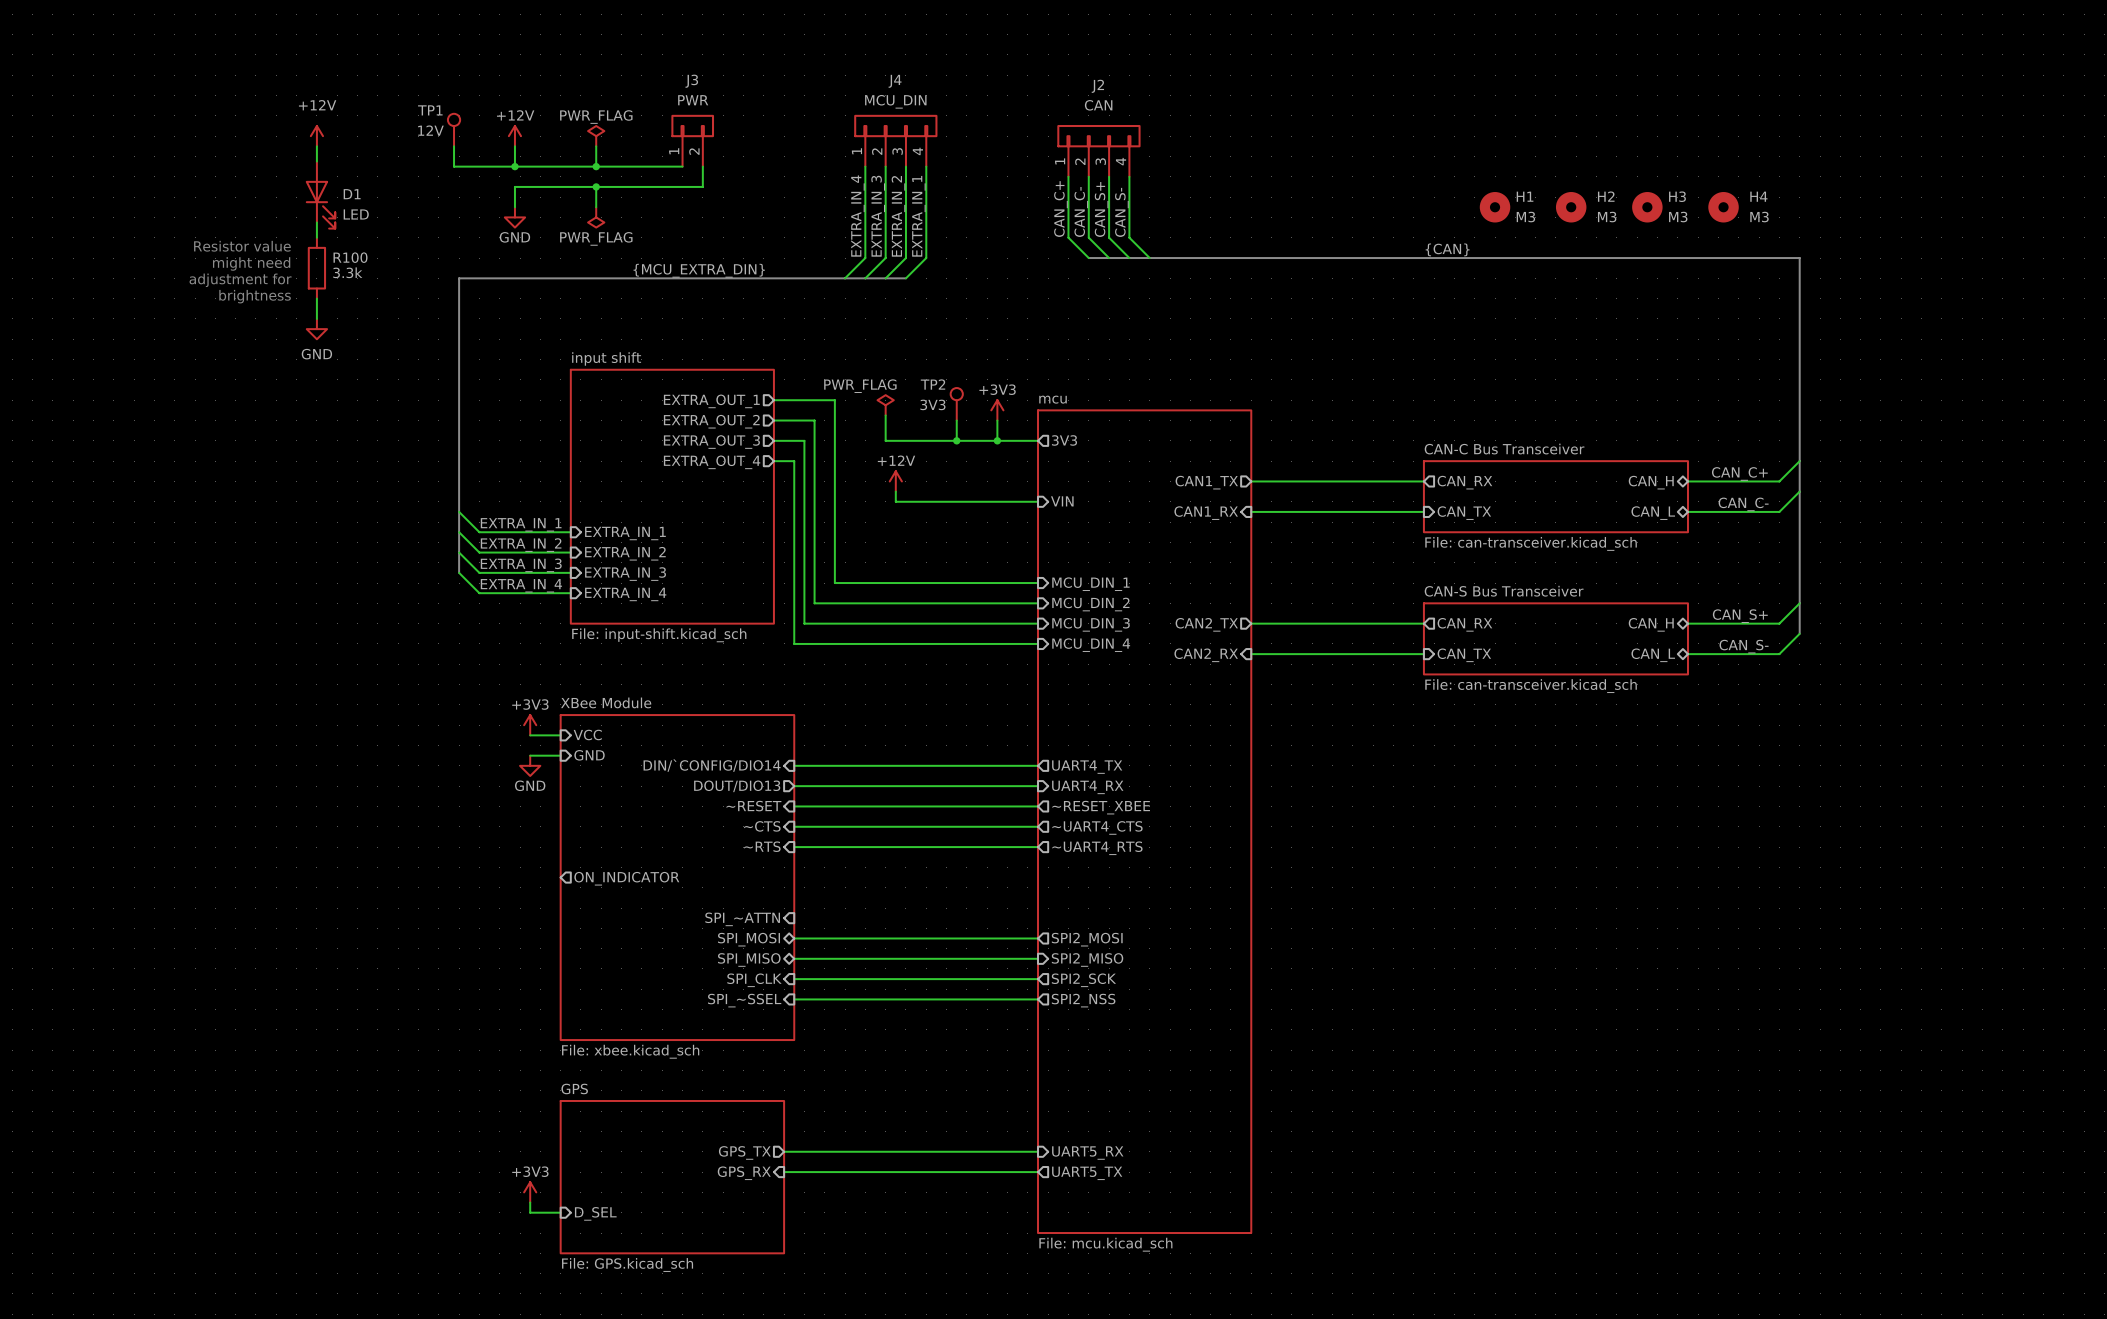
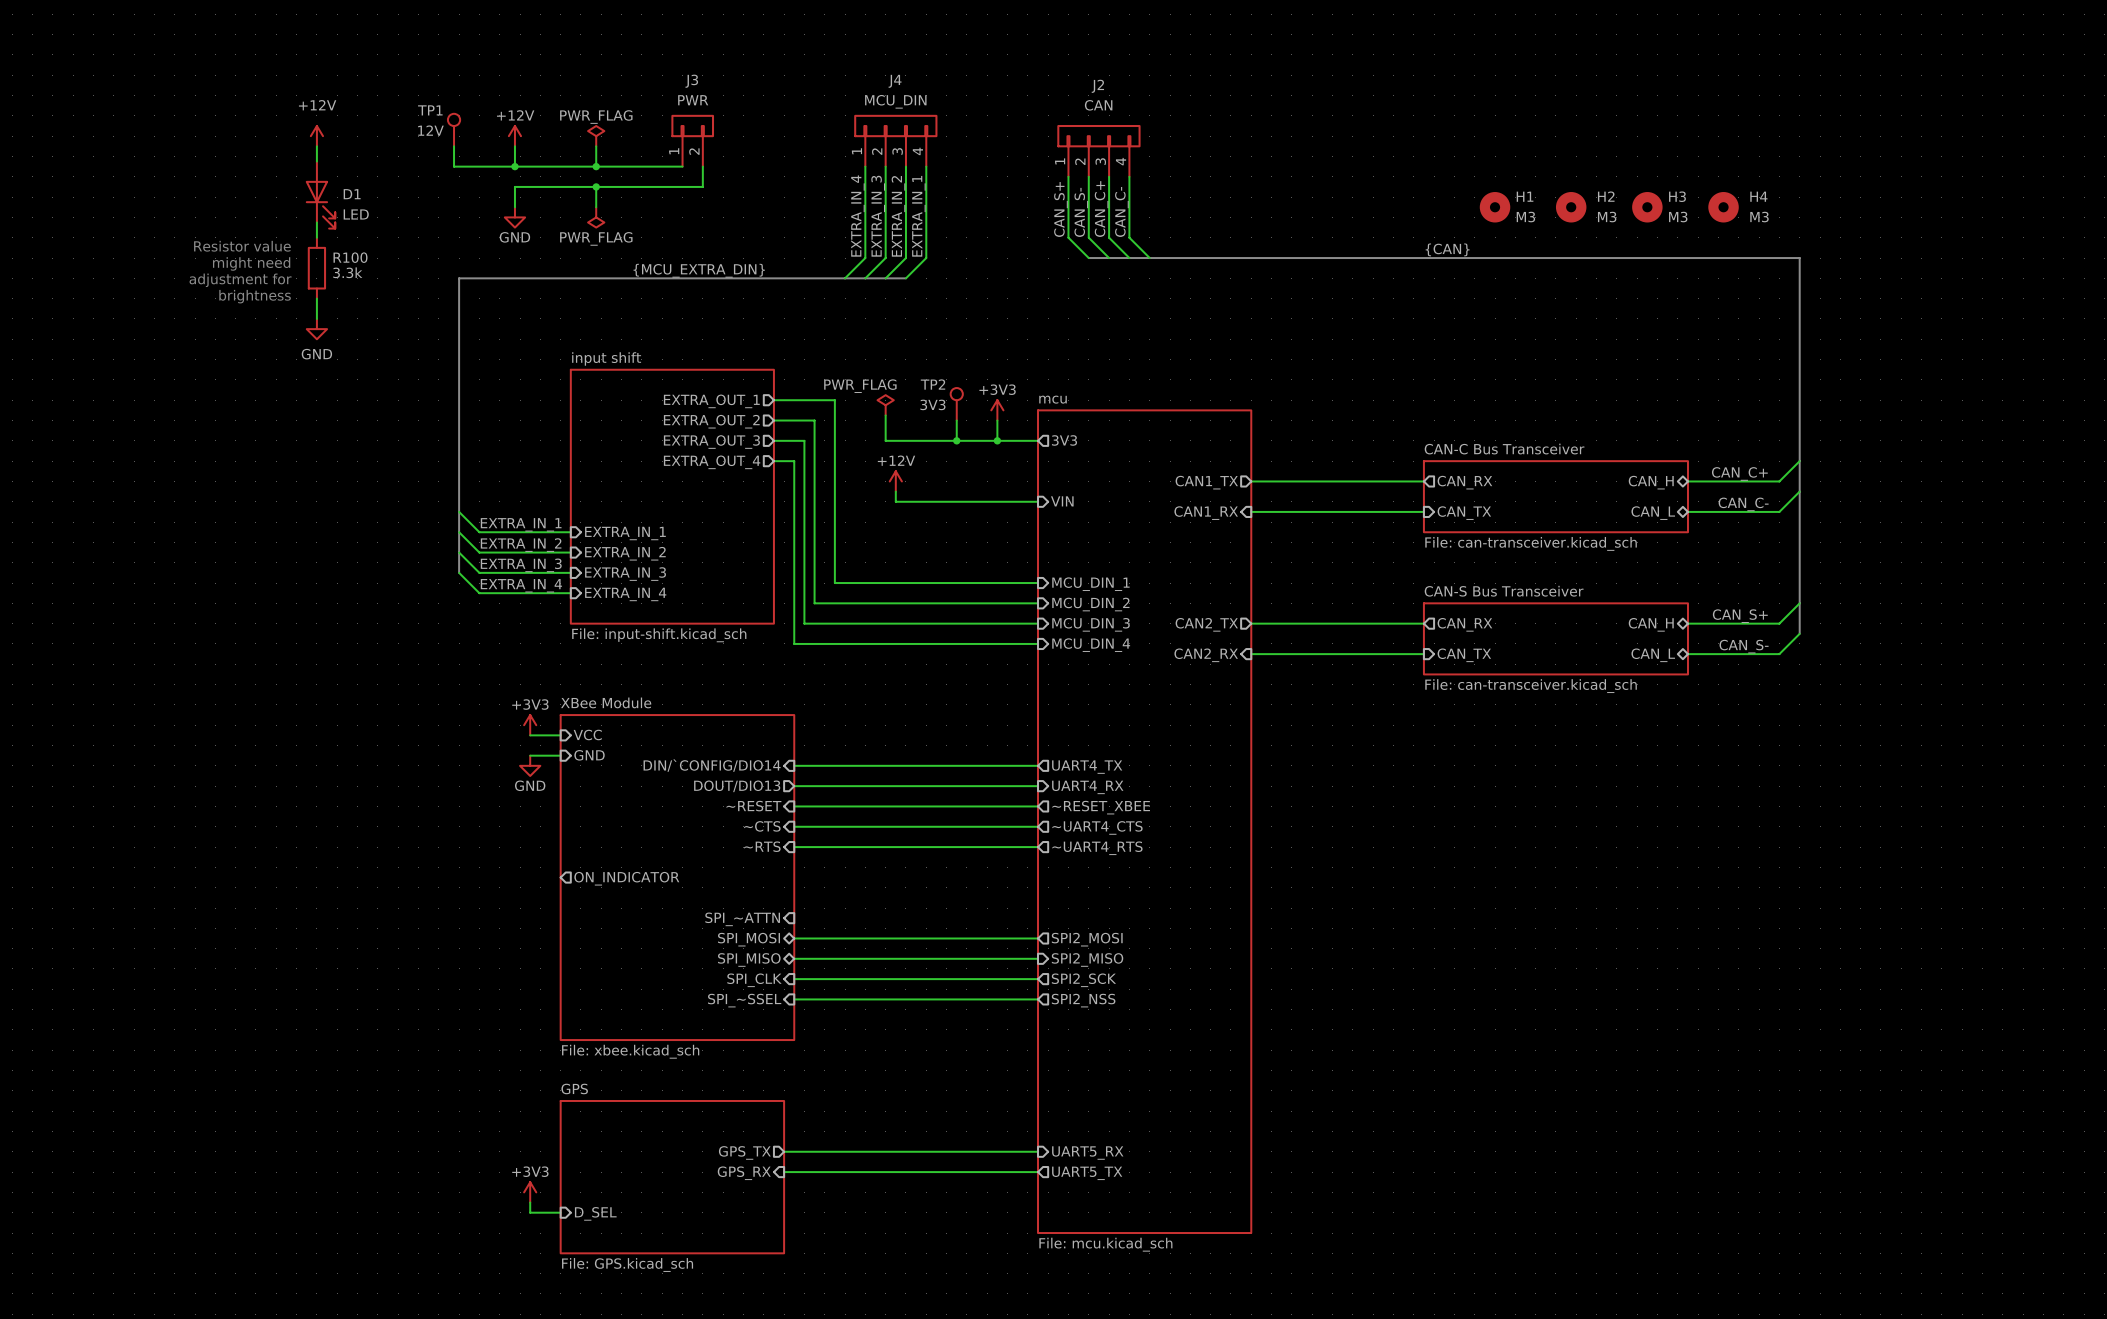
label: CAN_C+ (1060, 209) -> CAN_S+ (1060, 209)
label: CAN_S+ (1101, 209) -> CAN_C+ (1101, 209)
label: CAN_C- (1081, 211) -> CAN_S- (1081, 212)
label: CAN_S- (1121, 212) -> CAN_C- (1121, 211)

